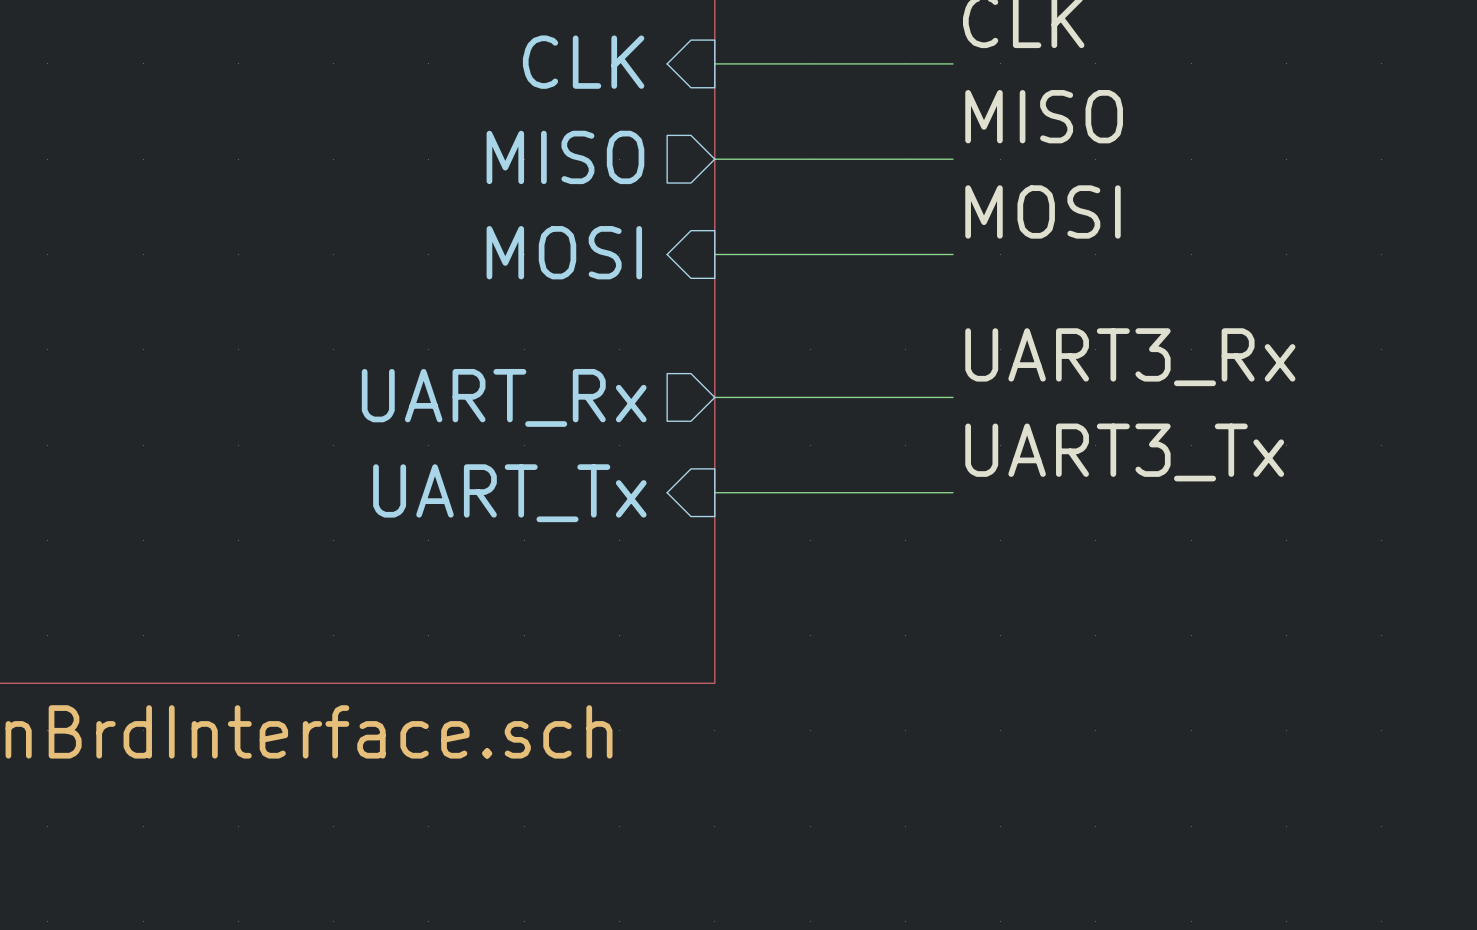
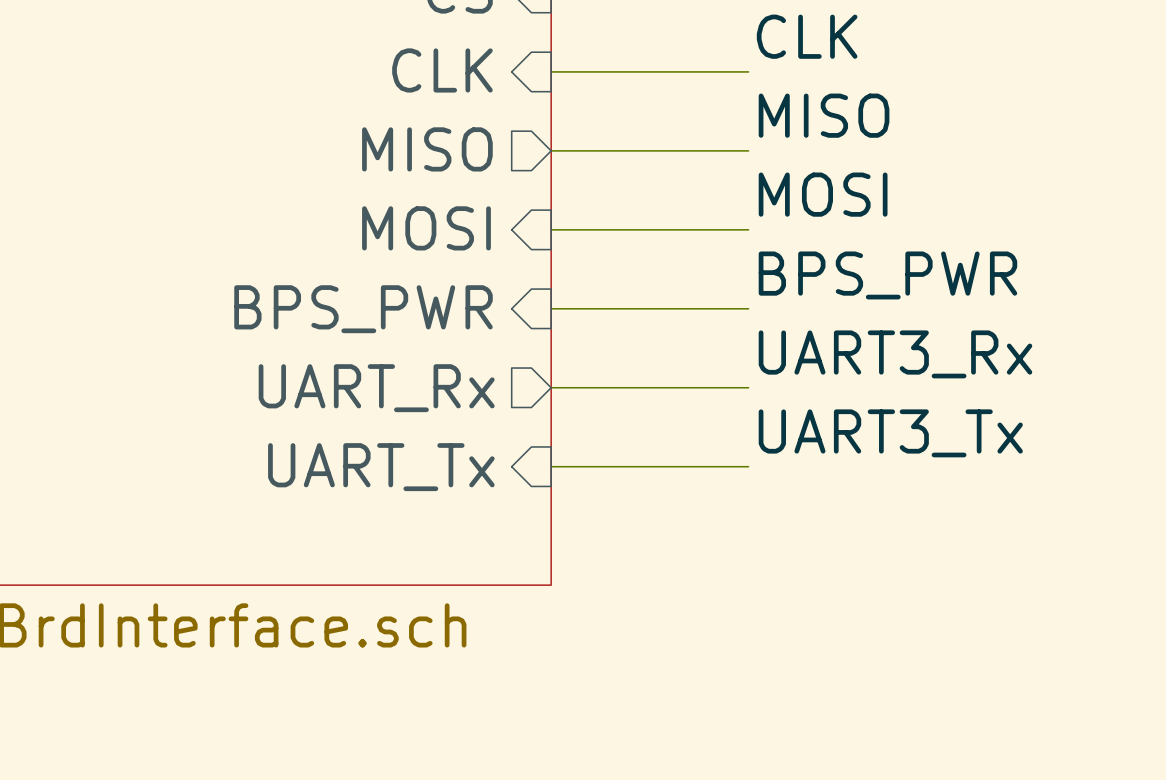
label: none -> BPS_PWR (887, 275)
wire: none -> (551, 308) (748, 308)
sheet pin: none -> BPS_PWR (363, 309)
label position: UART3_Rx (1130, 357) -> UART3_Rx (895, 354)
sheet pin position: UART_Rx (504, 397) -> UART_Rx (376, 388)
wire: (714, 397) (953, 397) -> (551, 387) (748, 387)
label position: UART3_Tx (1124, 452) -> UART3_Tx (890, 433)
wire: (714, 492) (953, 492) -> (551, 466) (748, 466)
sheet pin position: UART_Tx (509, 493) -> UART_Tx (381, 467)

